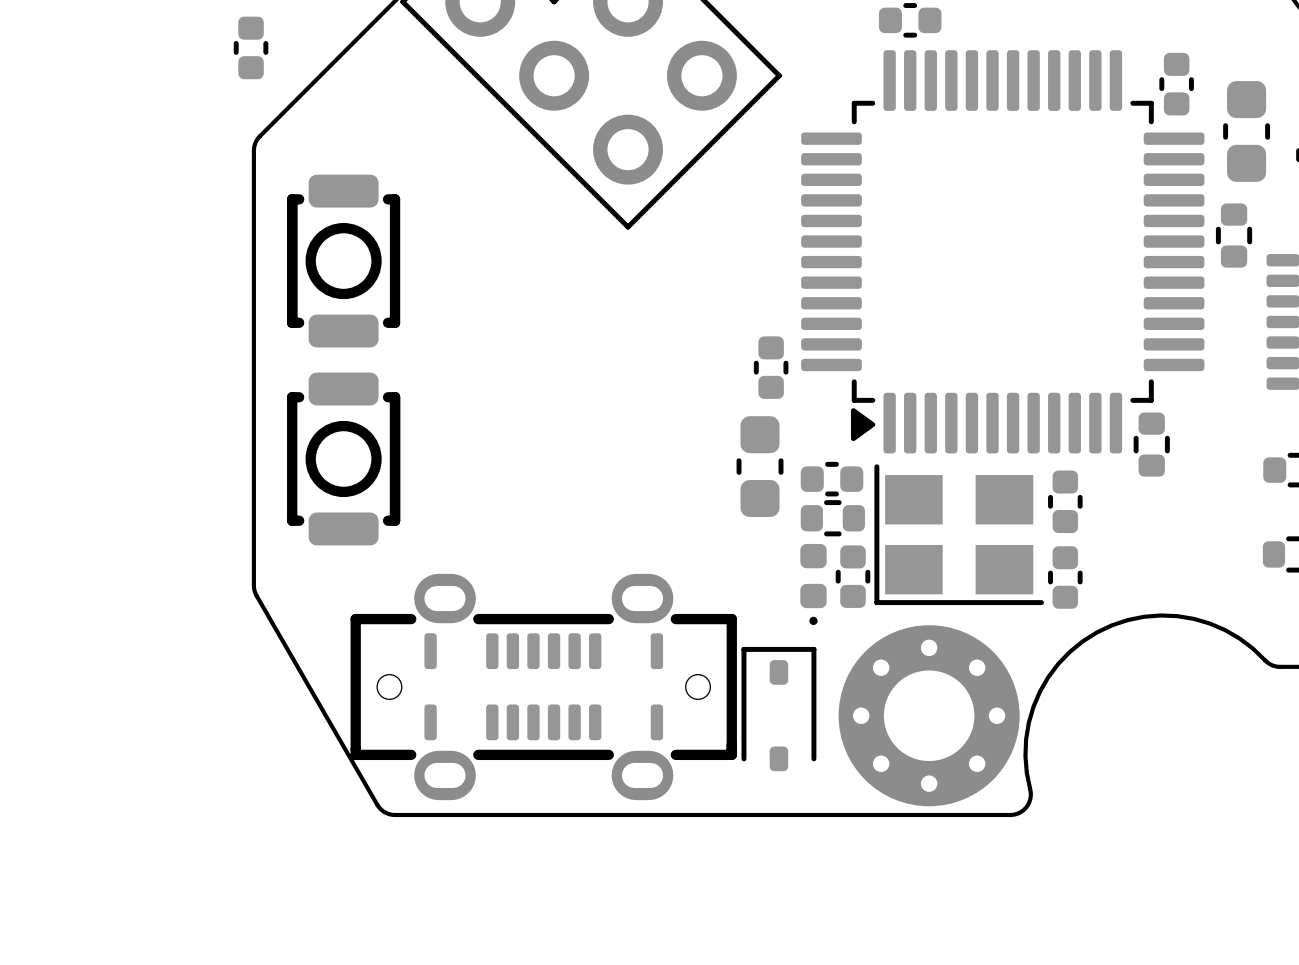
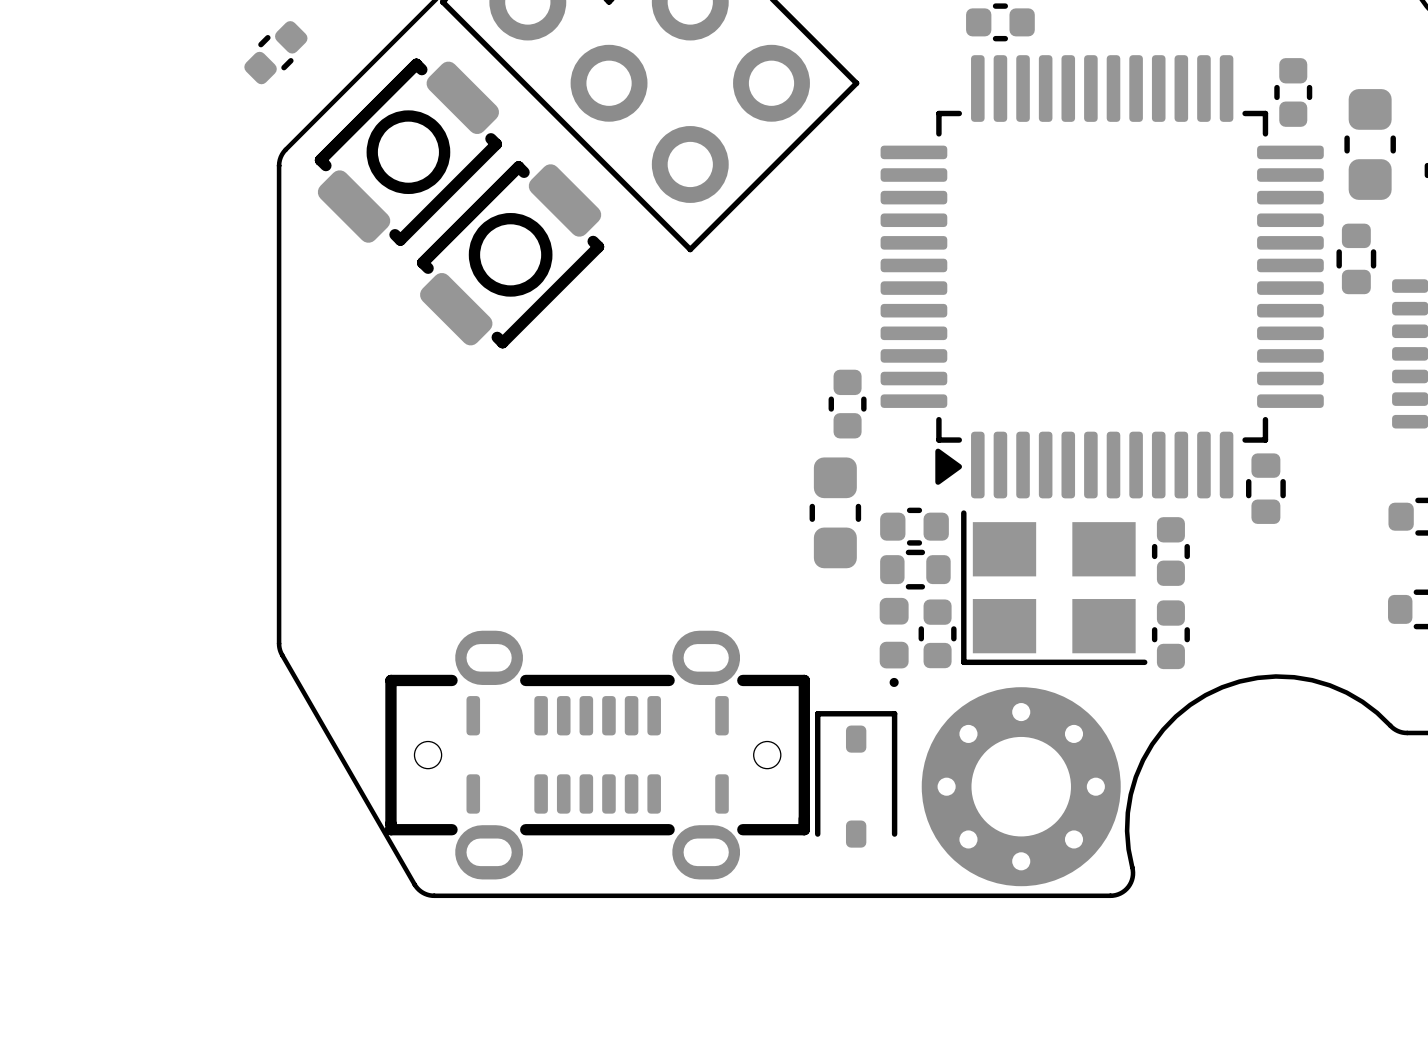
part rotation: 0° (251, 47) -> 45° clockwise (275, 52)
part: none -> (408, 152)
part: none -> (510, 254)
part: (343, 261) -> none
part: (343, 458) -> none

